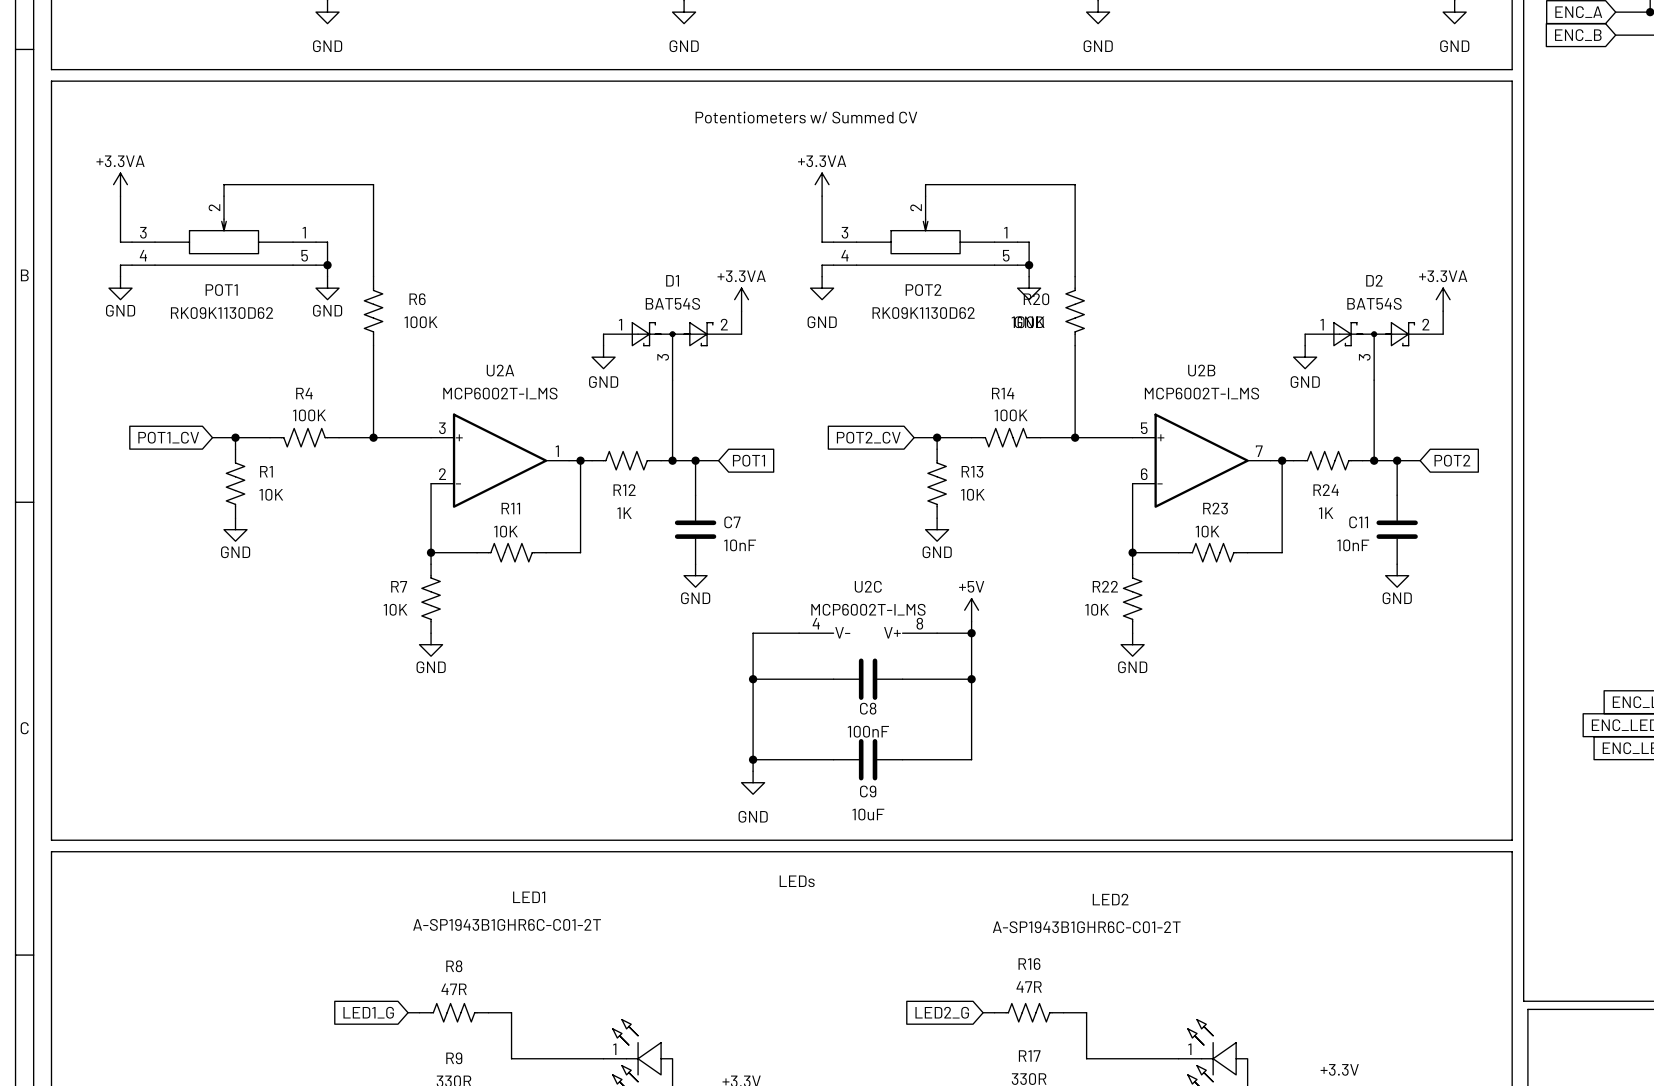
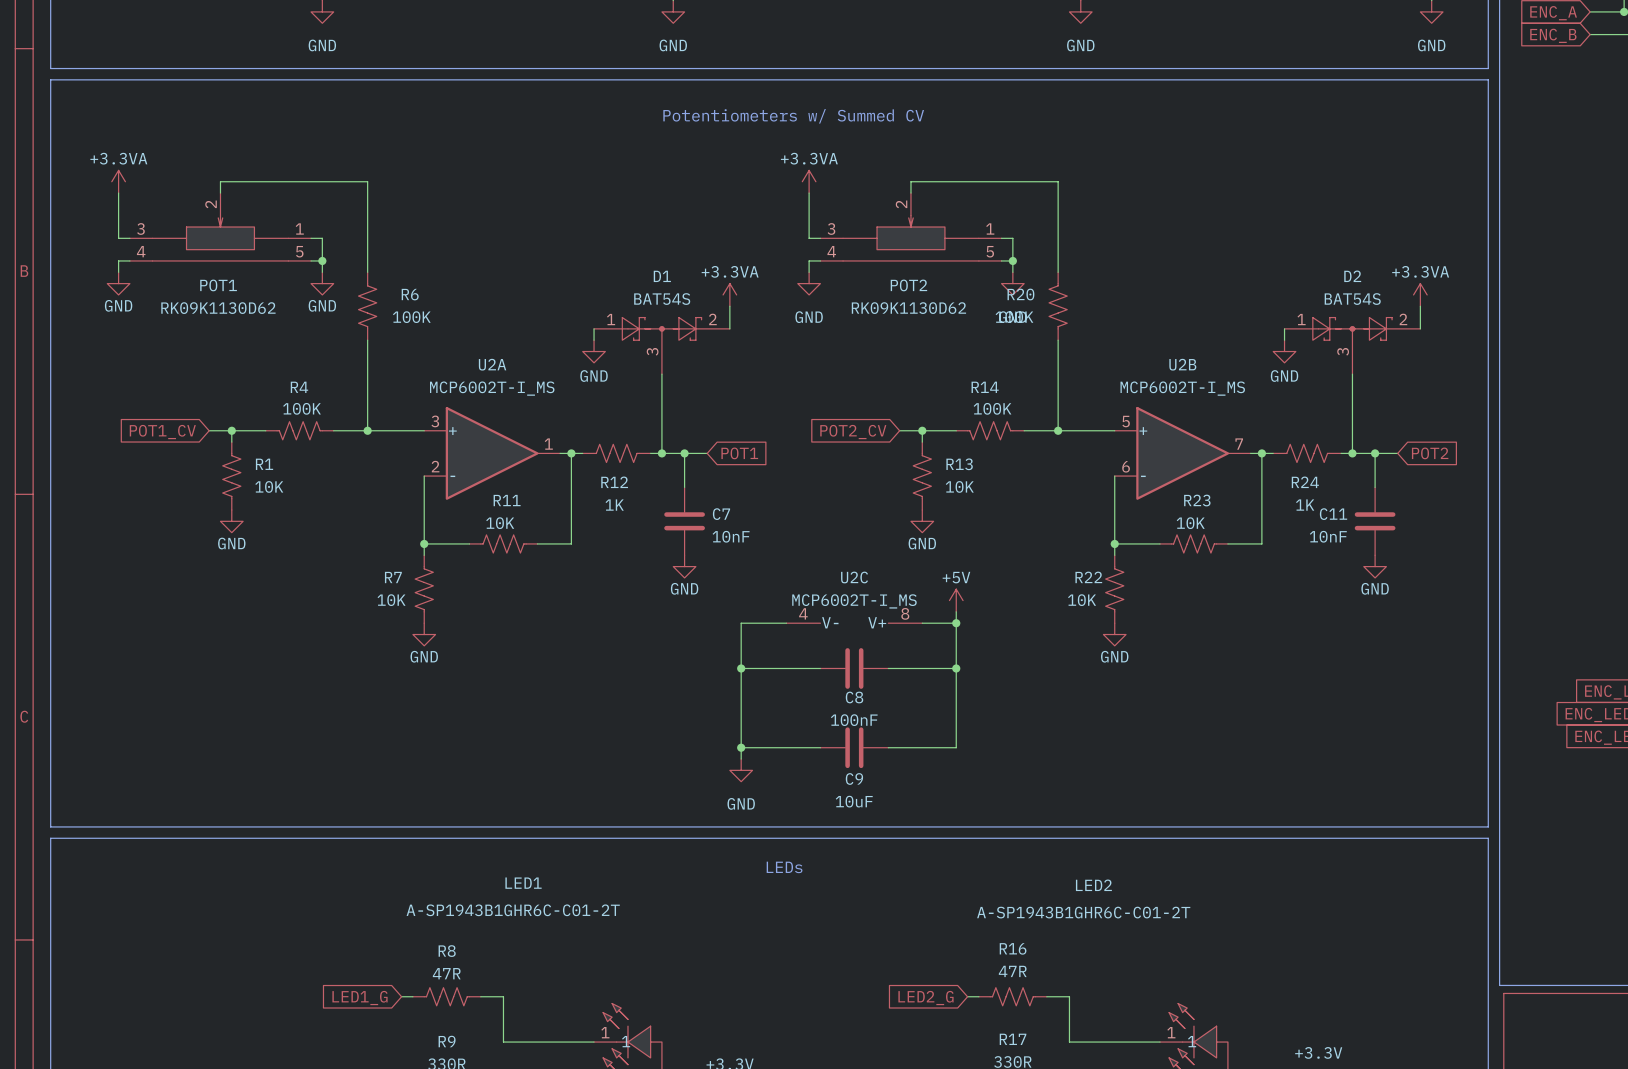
LED1 pin name: none -> 1 (626, 1041)
LED2 pin name: none -> 1 (1192, 1041)

